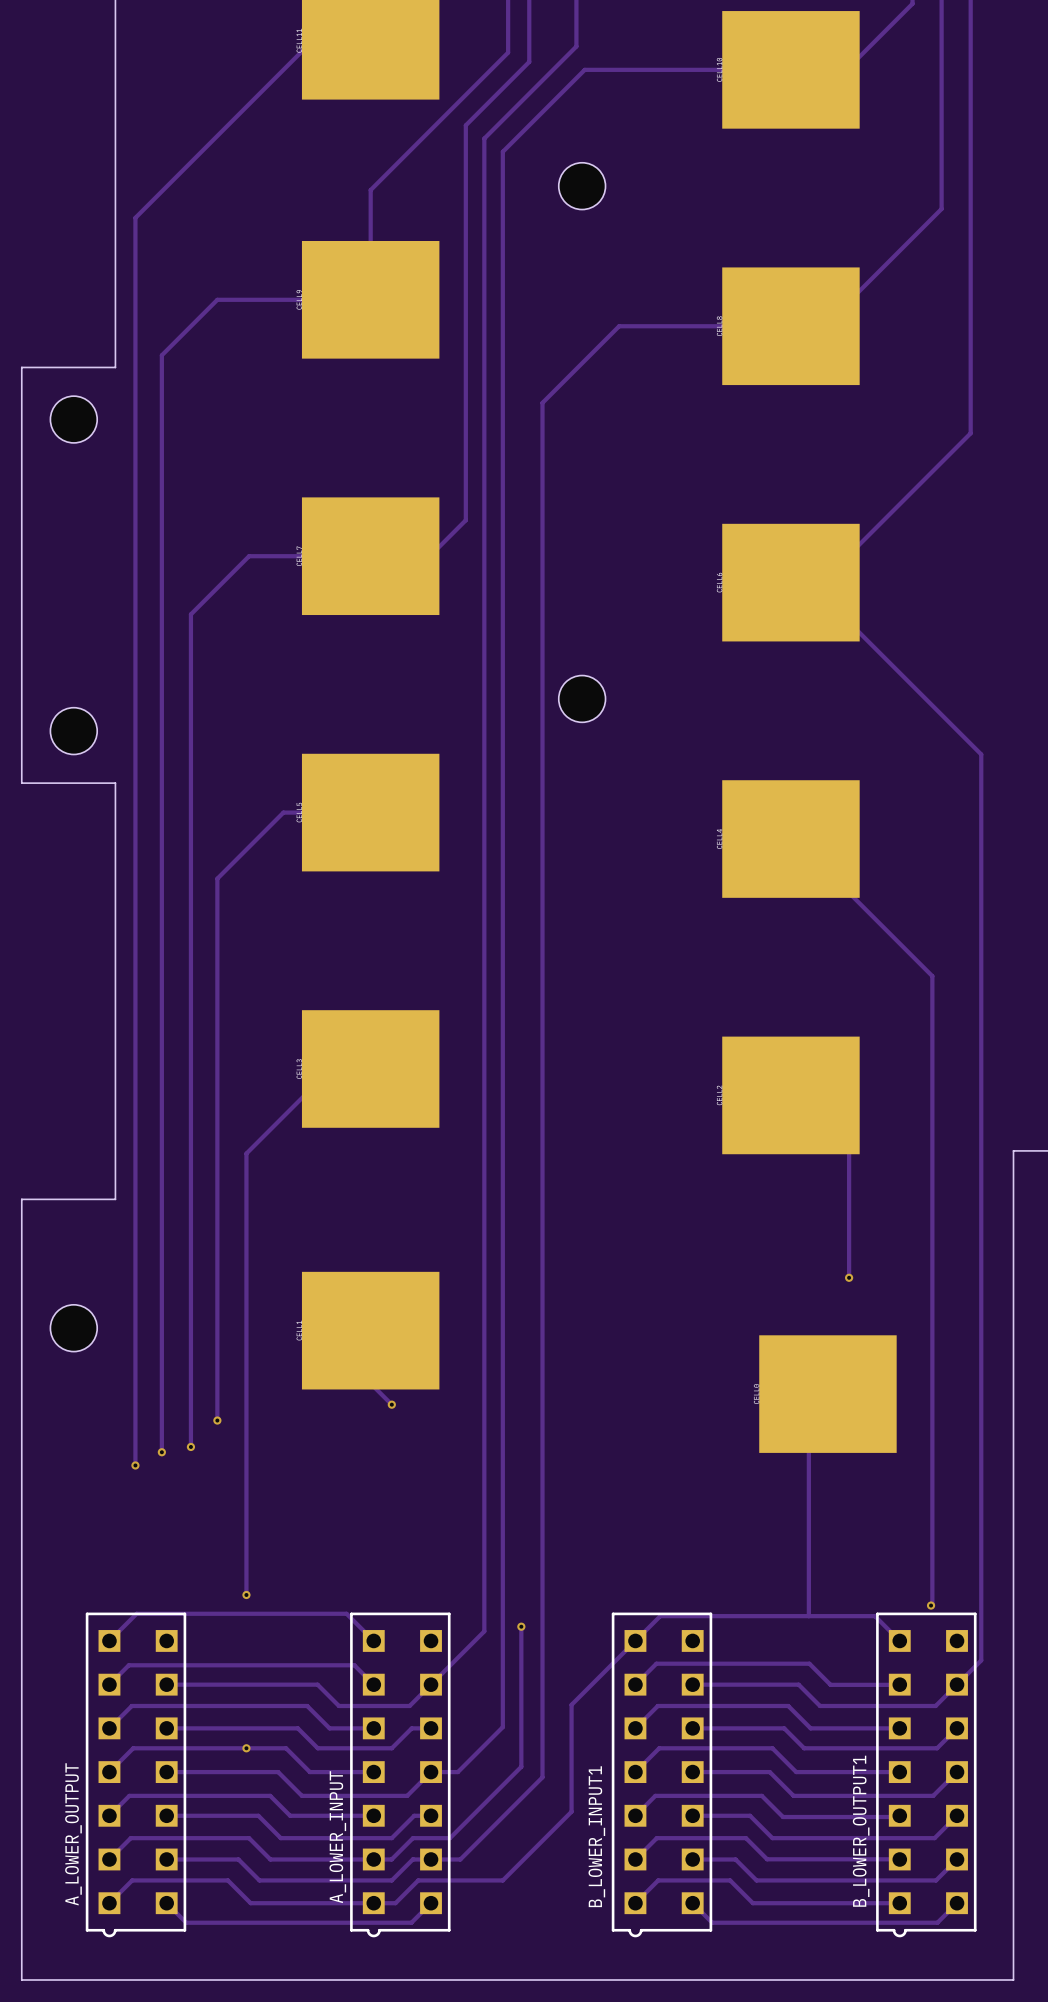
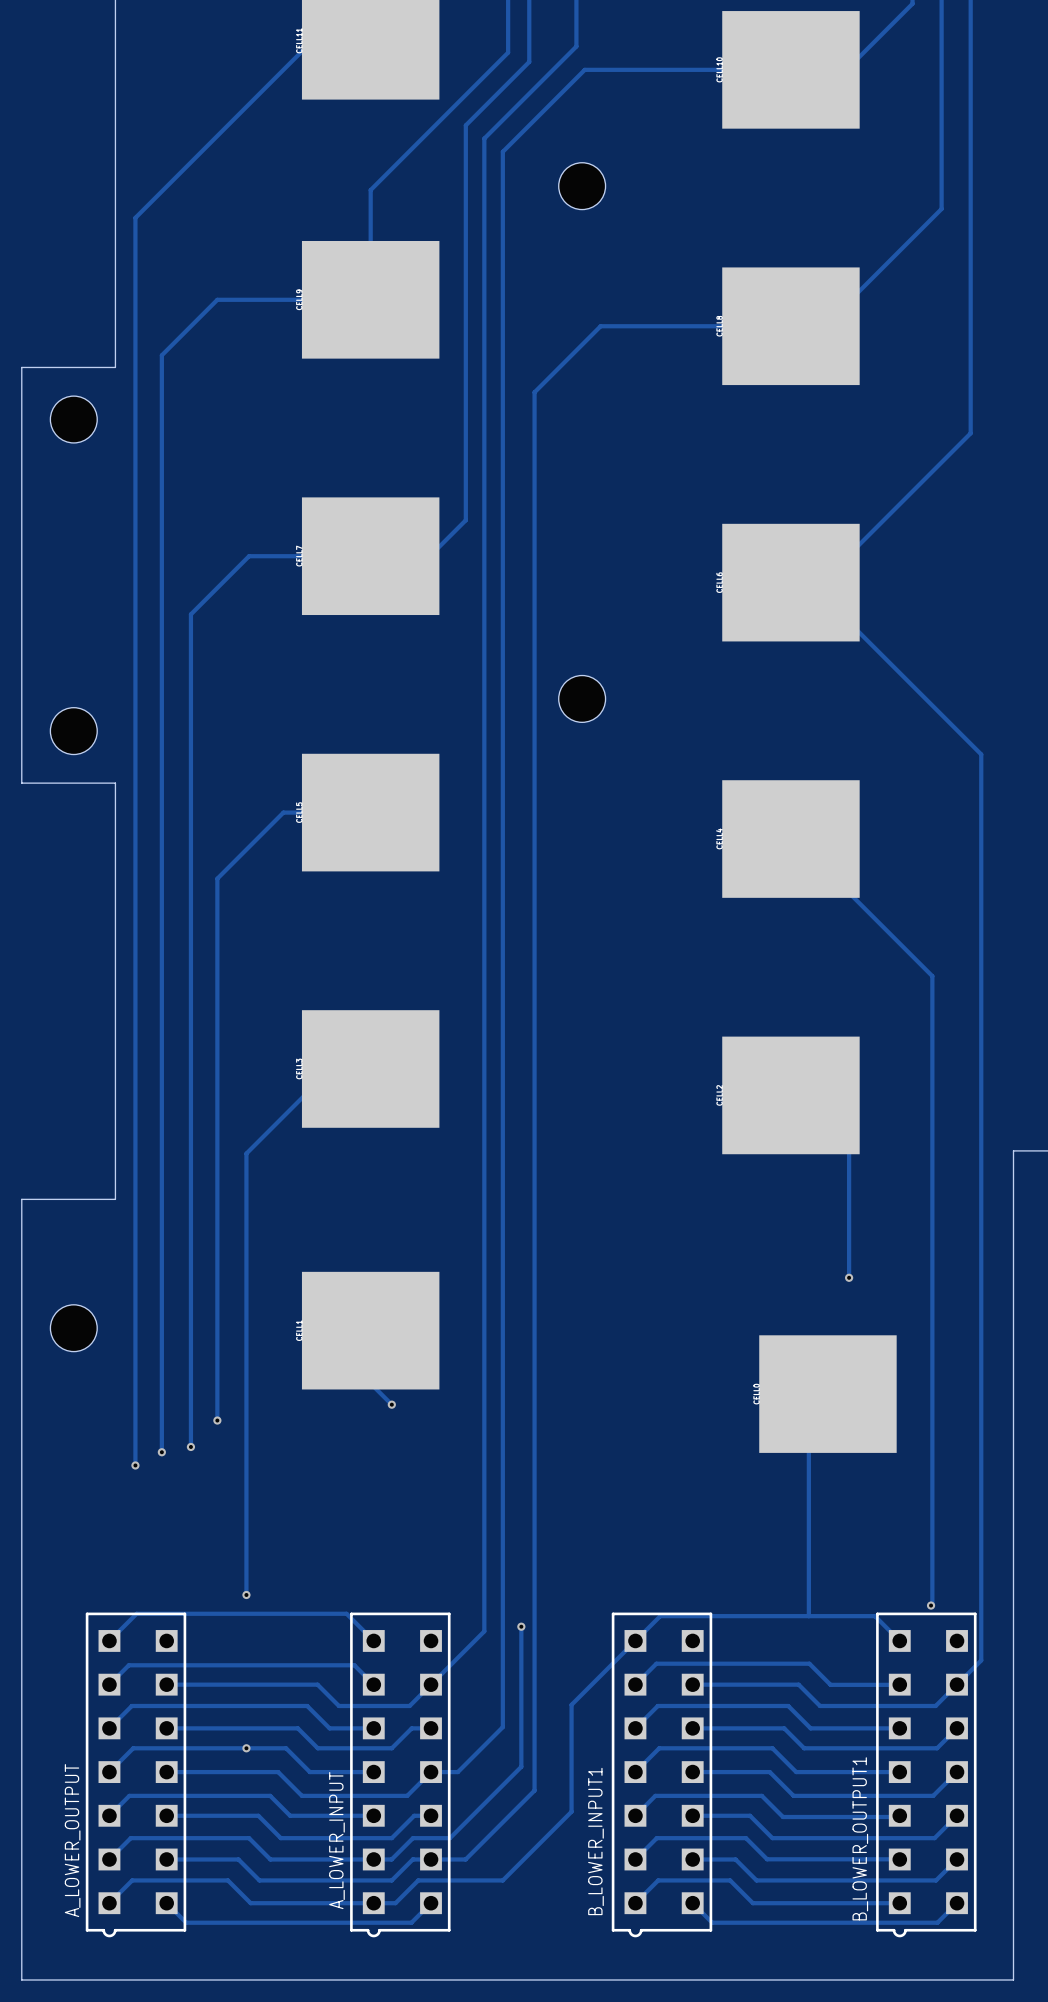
track: (619, 326) (542, 402) (542, 1777) (460, 1859) -> (619, 326) (600, 326) (534, 392) (534, 1790) (465, 1859) (460, 1859)

